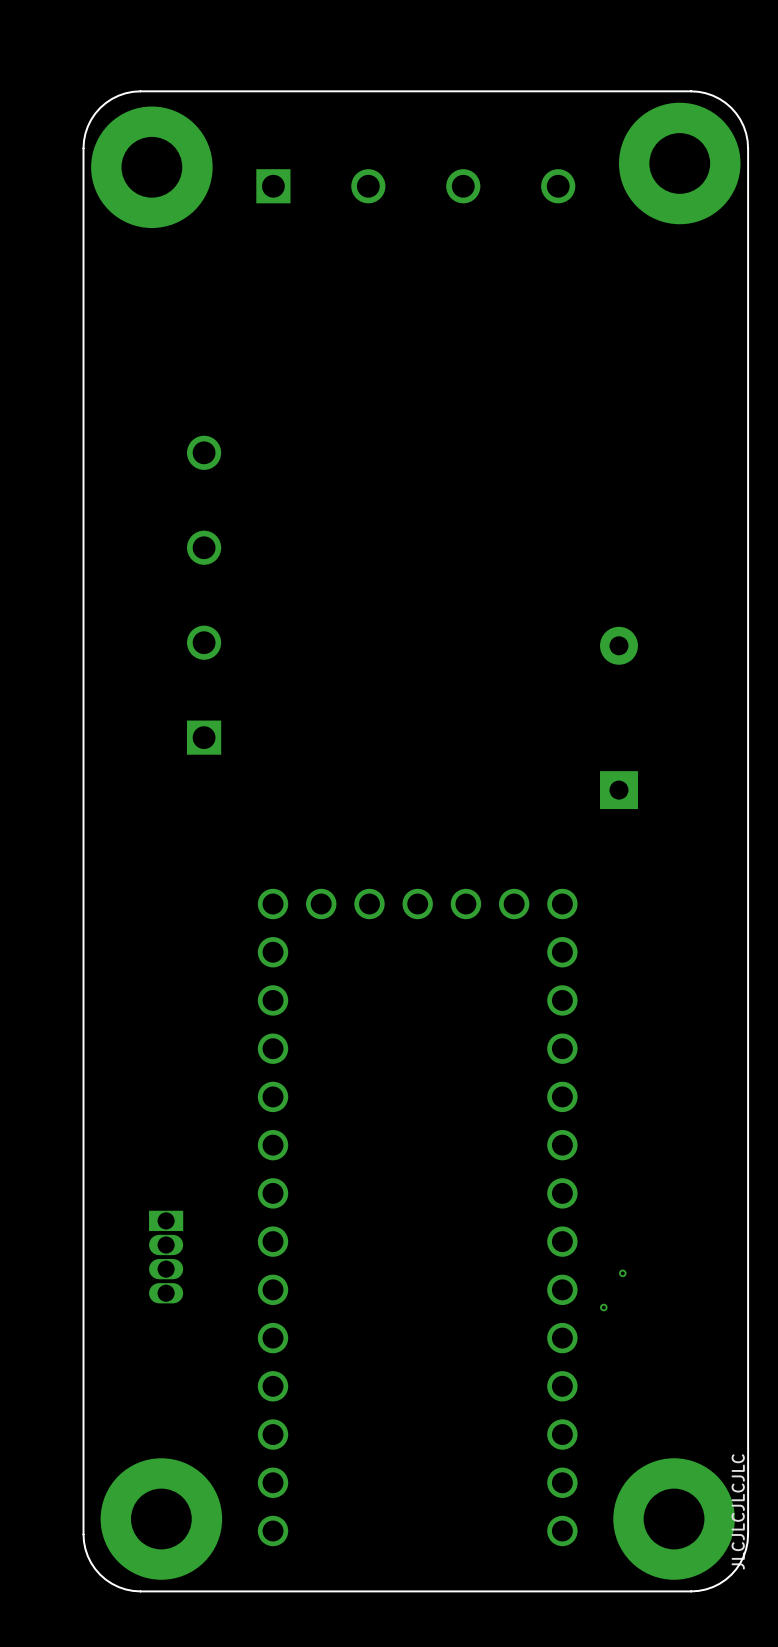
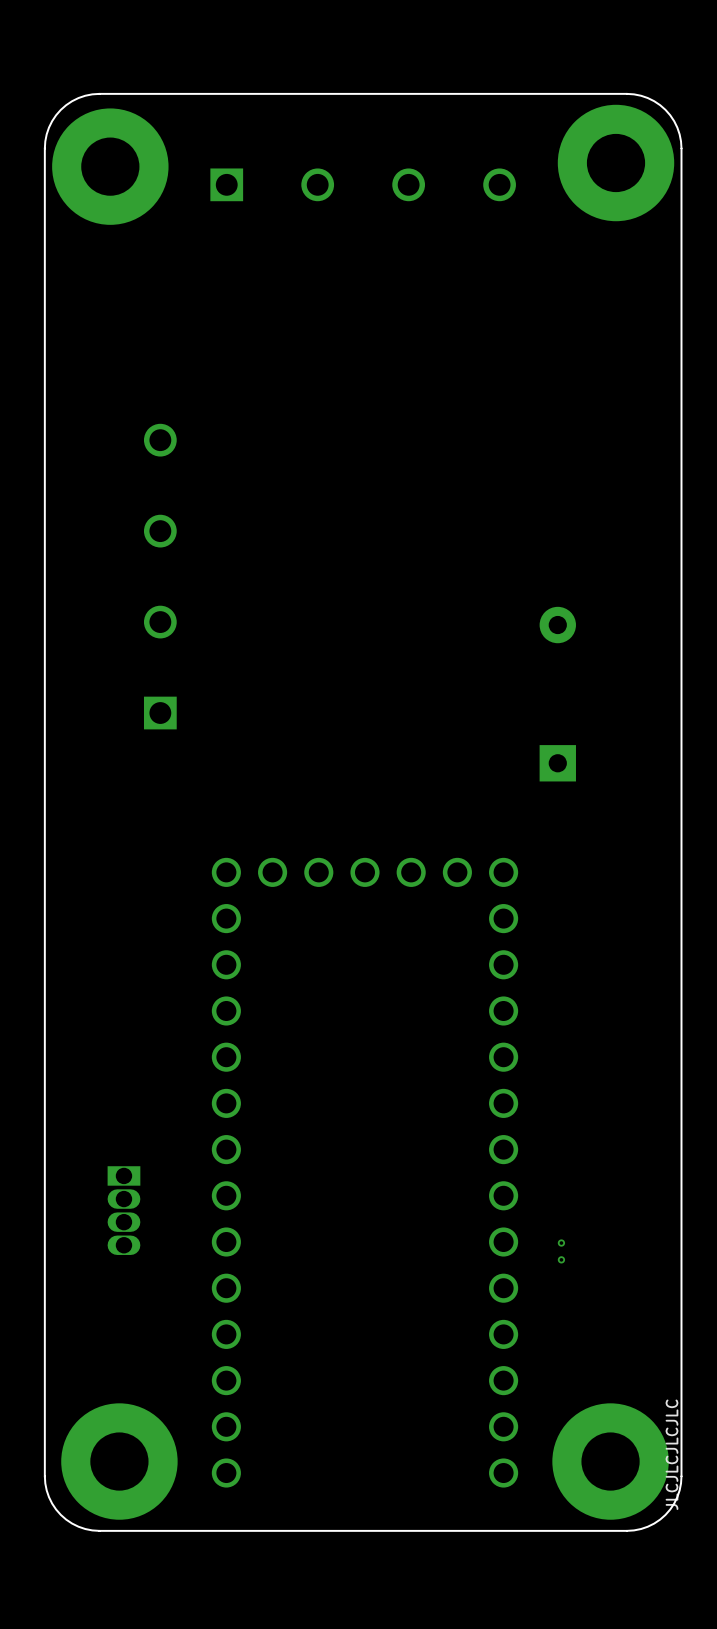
via: (622, 1273) -> none
via: none -> (561, 1243)
via: (603, 1307) -> none
via: none -> (561, 1259)

